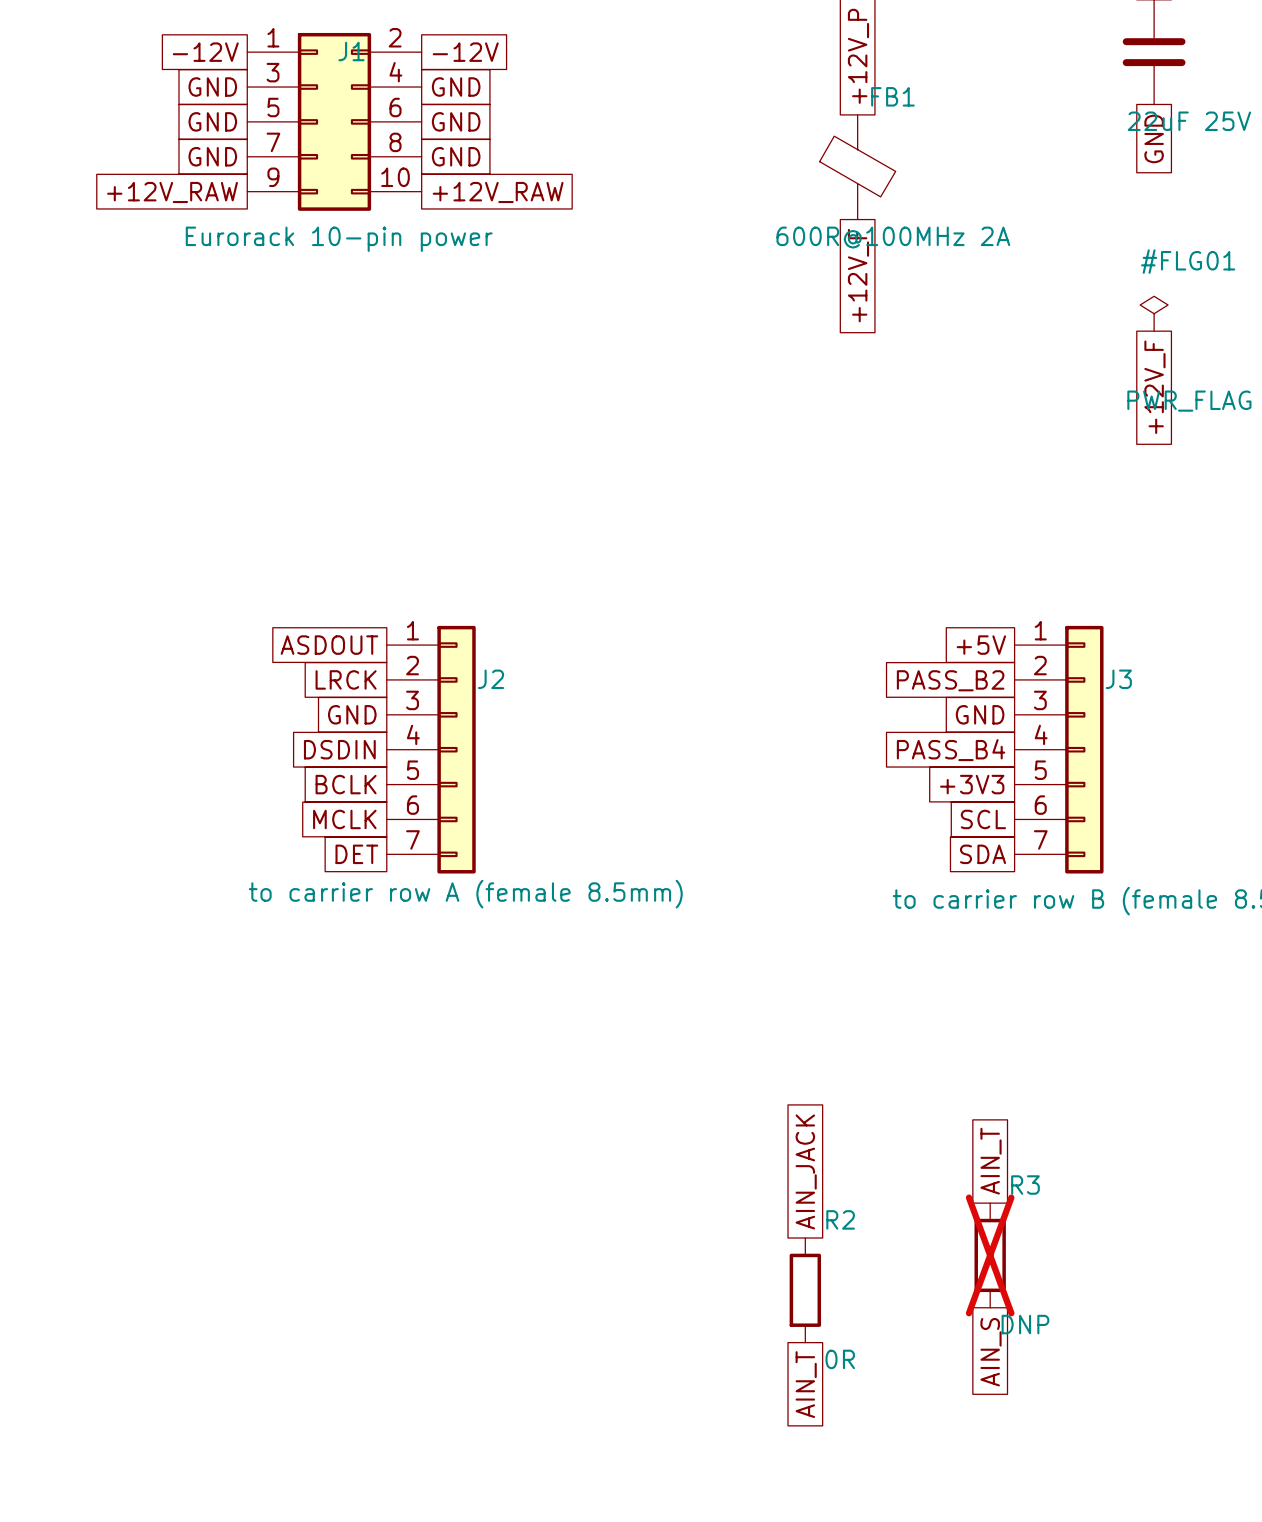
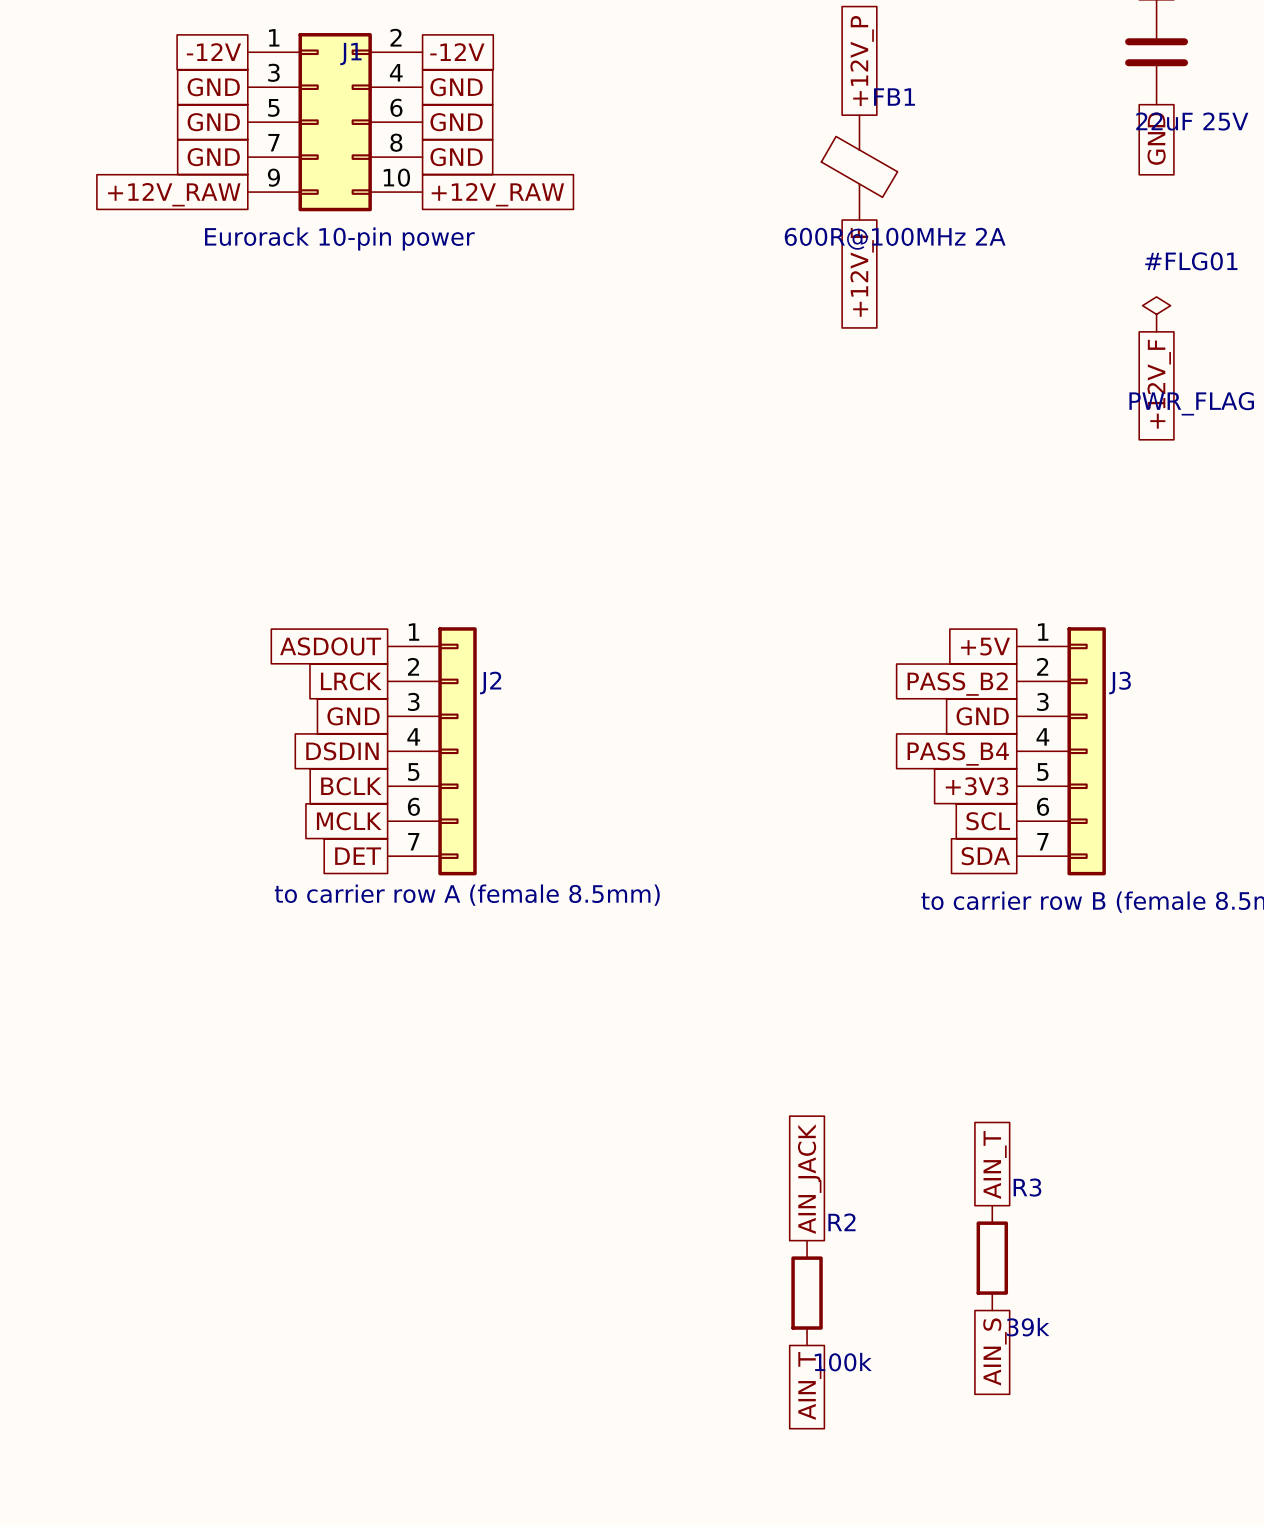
R3 do-not-place cross: (990, 1255) -> none
R3 value: DNP (1025, 1324) -> 39k (1028, 1327)
R2 value: 0R (840, 1359) -> 100k (843, 1362)

